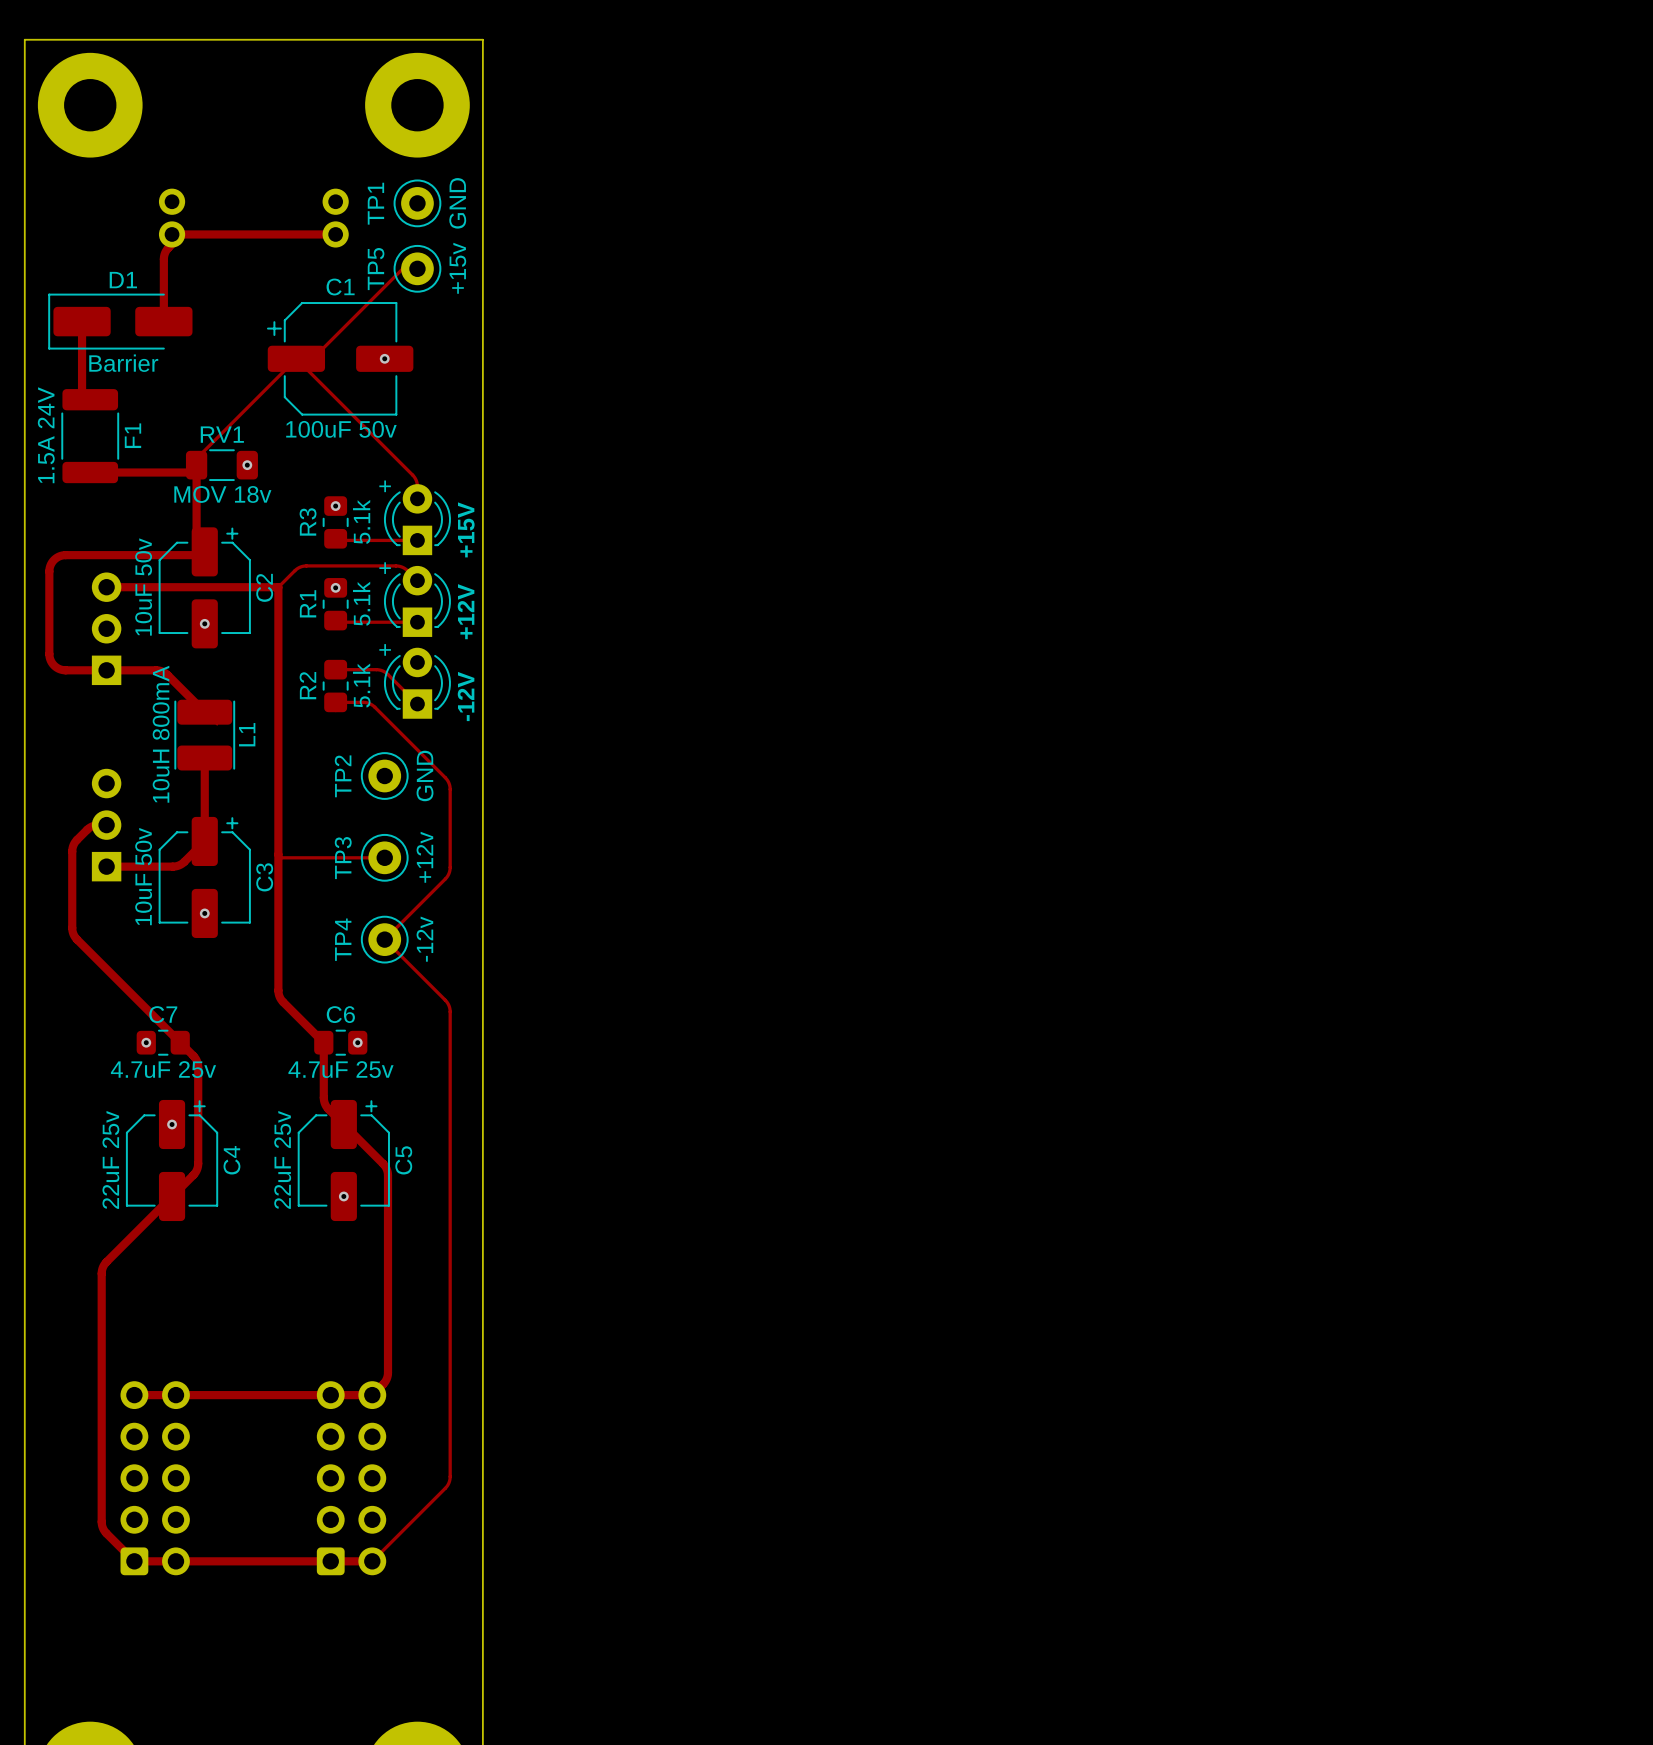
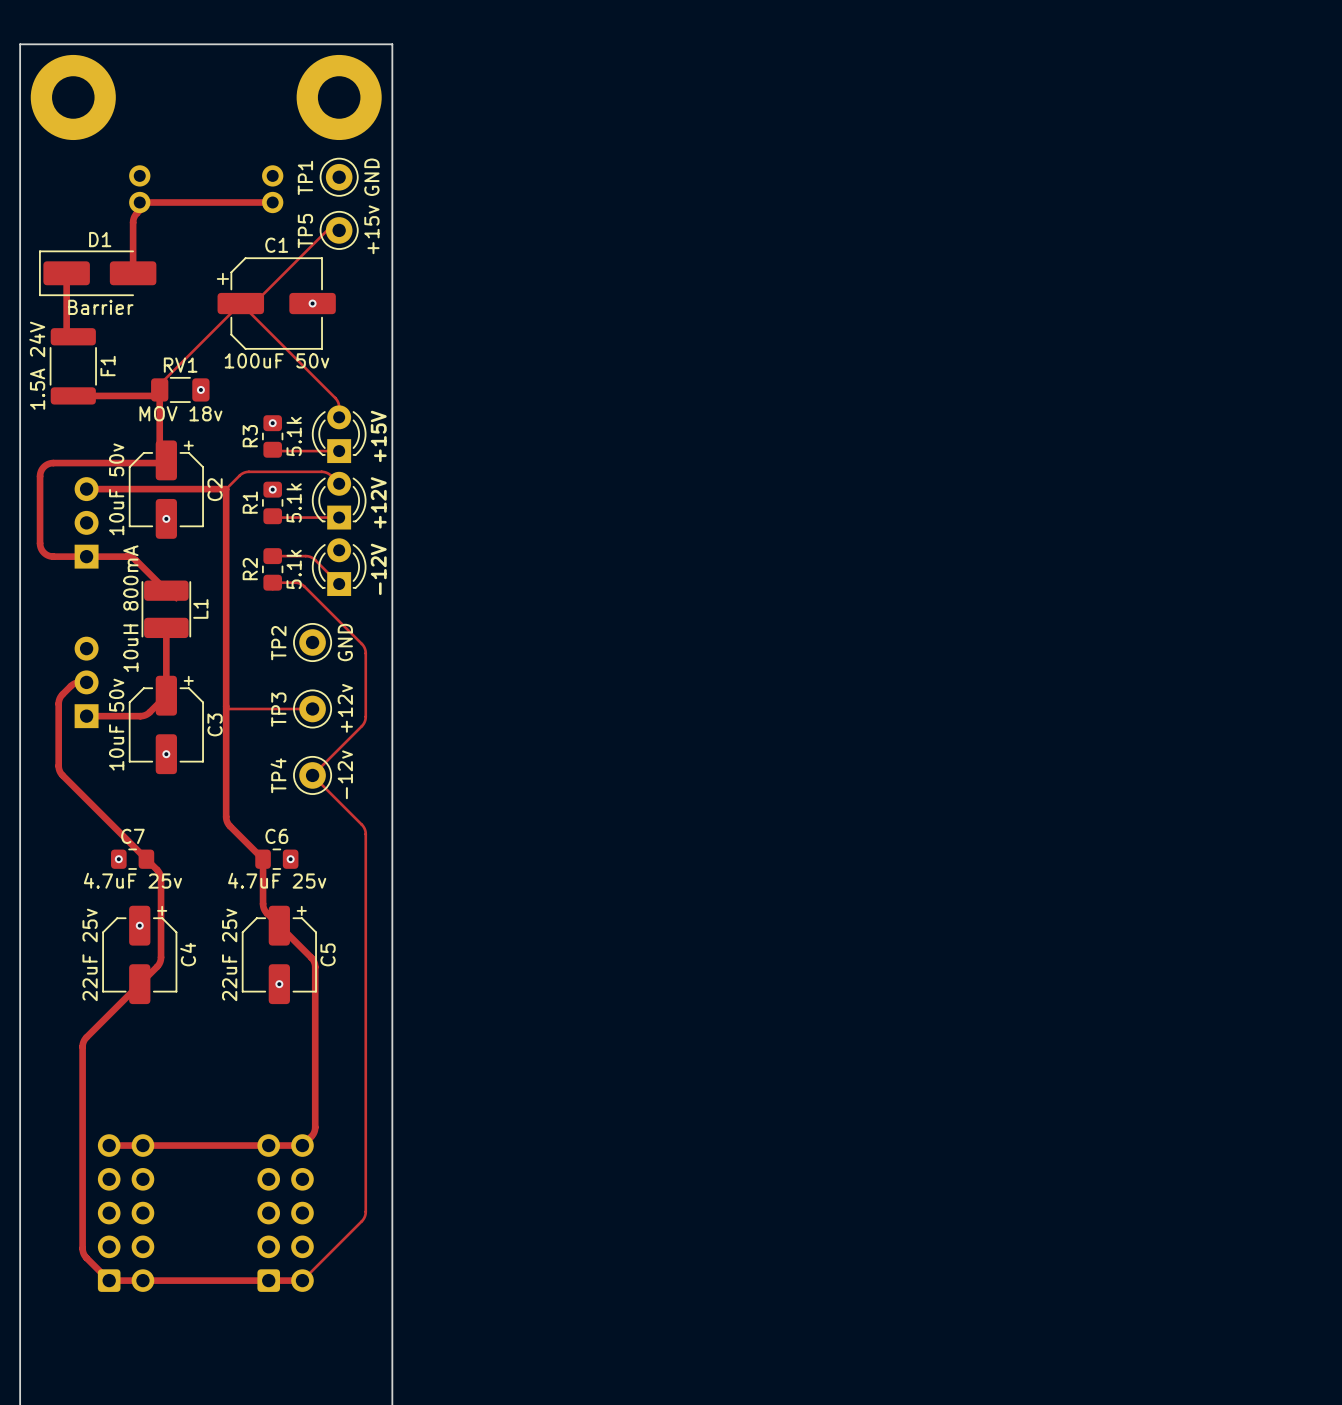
text: + (385, 486) -> none
text: + (385, 568) -> none
text: + (385, 649) -> none

